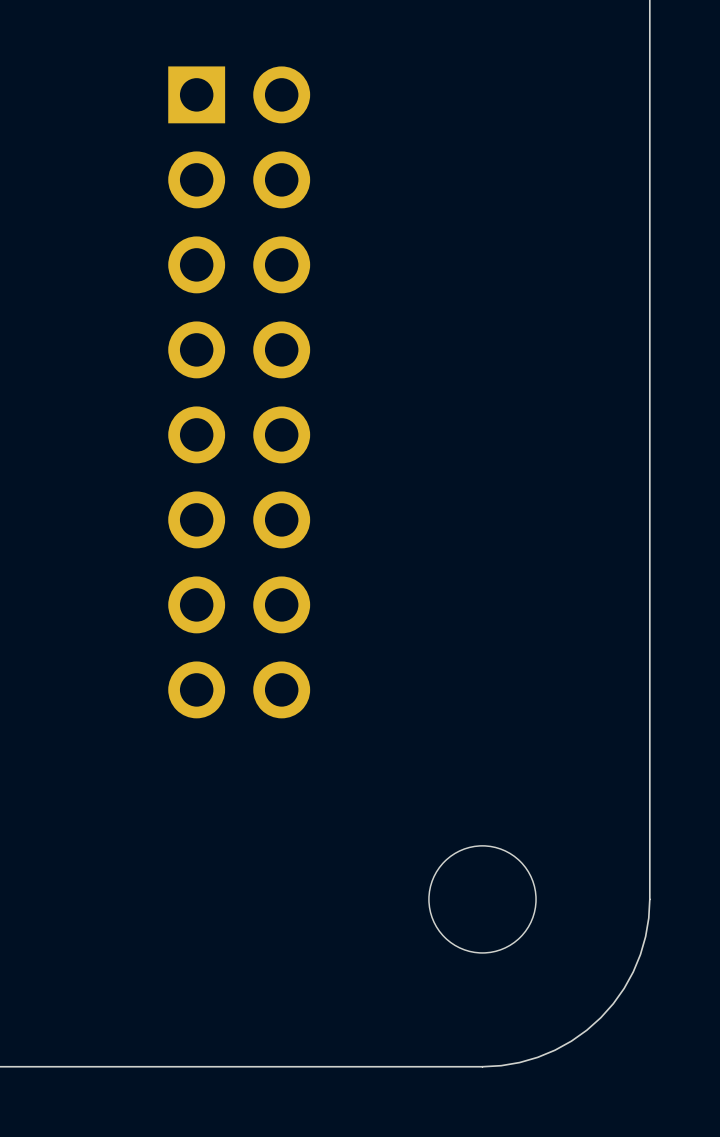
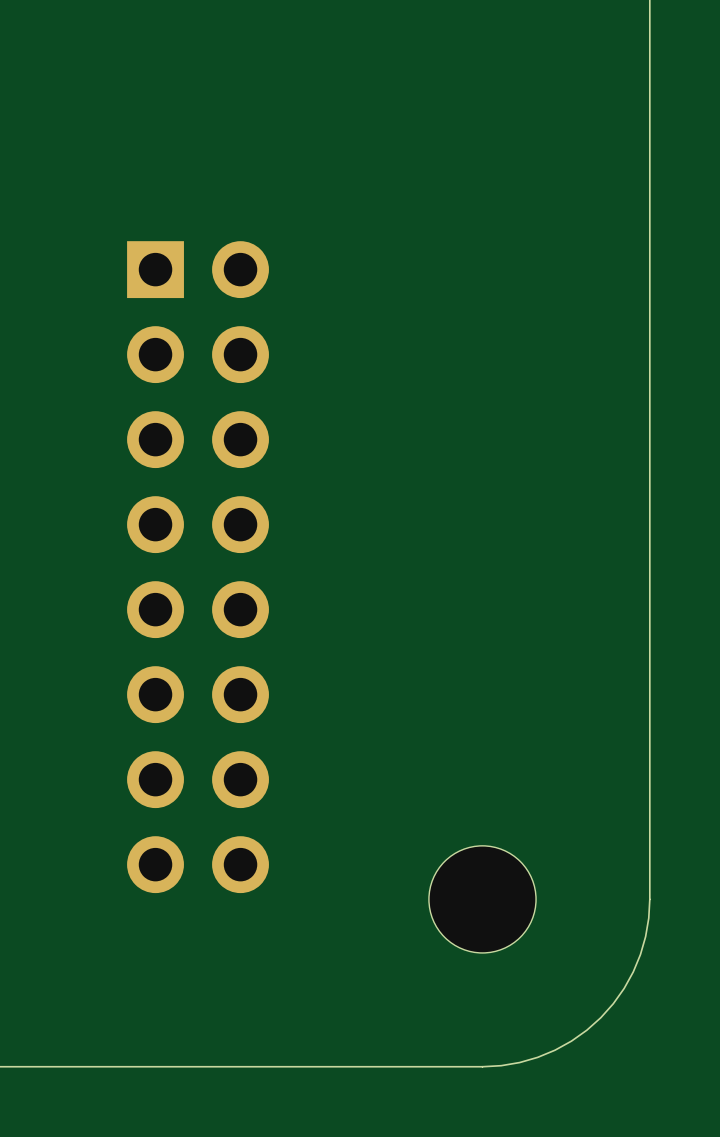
part position: (239, 392) -> (198, 567)

